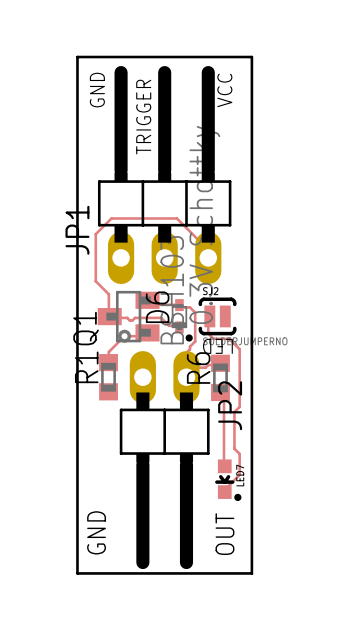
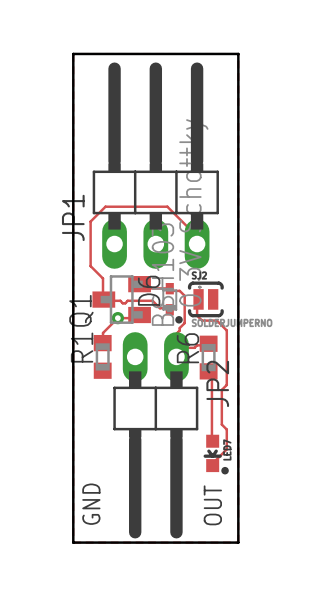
text: GND (97, 90) -> none
text: VCC (224, 90) -> none
text: TRIGGER (143, 117) -> none
text: LED (217, 346) -> none

